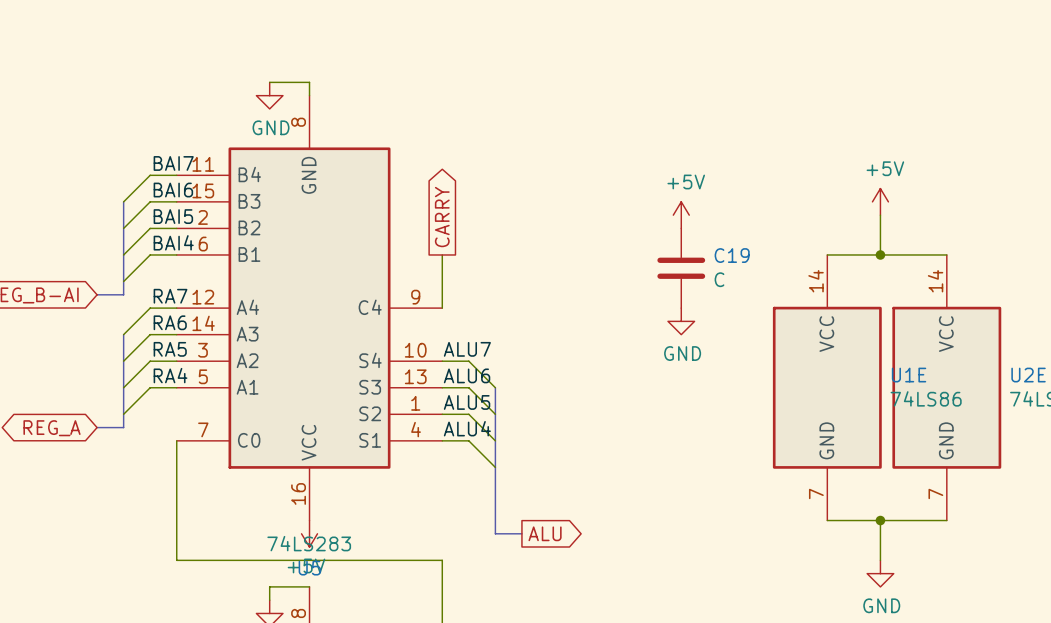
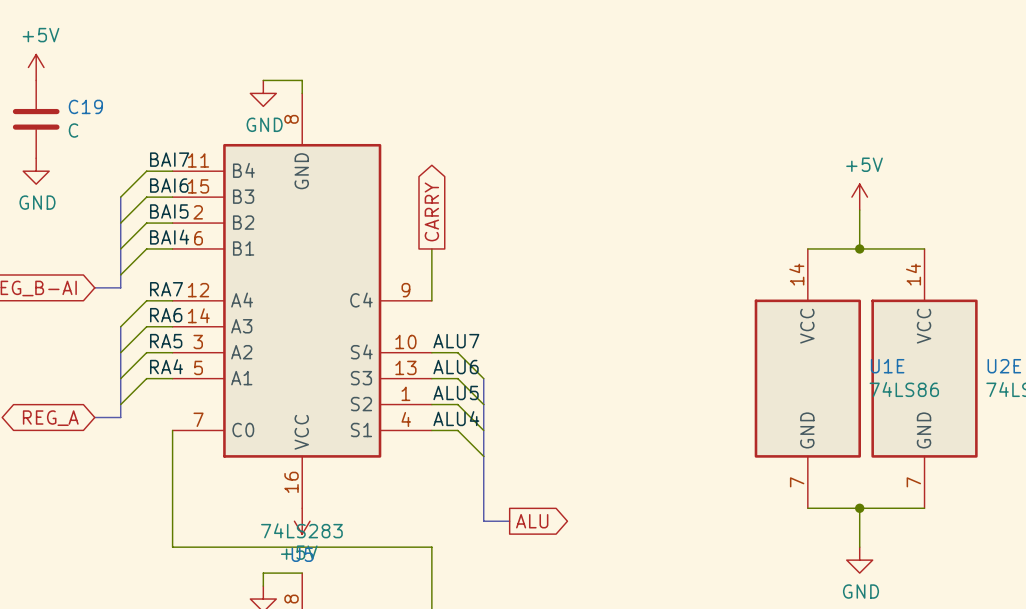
power symbol: none -> +5V (36, 67)
power symbol: none -> GND (36, 171)
power symbol: +5V (681, 215) -> none
C19 position: (681, 268) -> (36, 119)
power symbol: GND (681, 321) -> none

